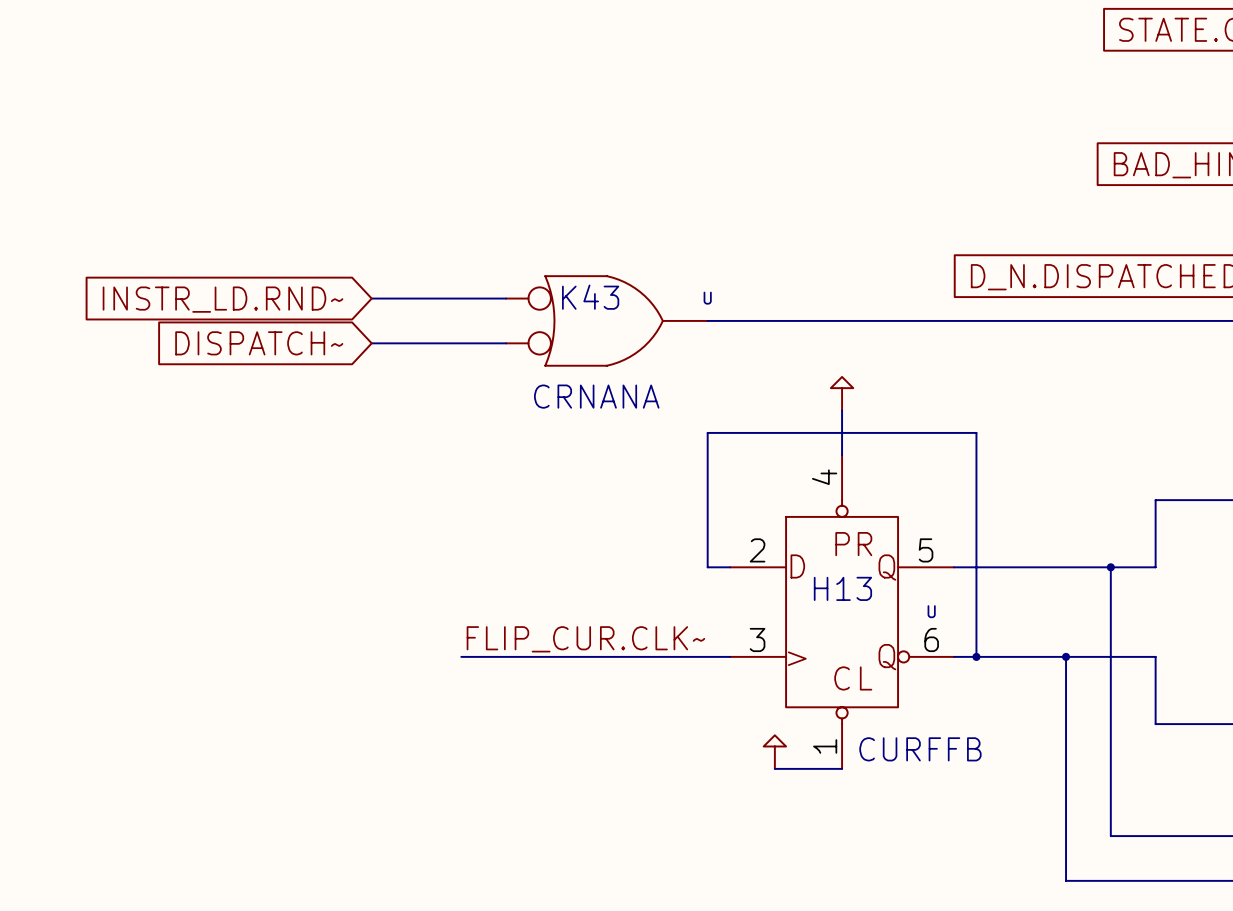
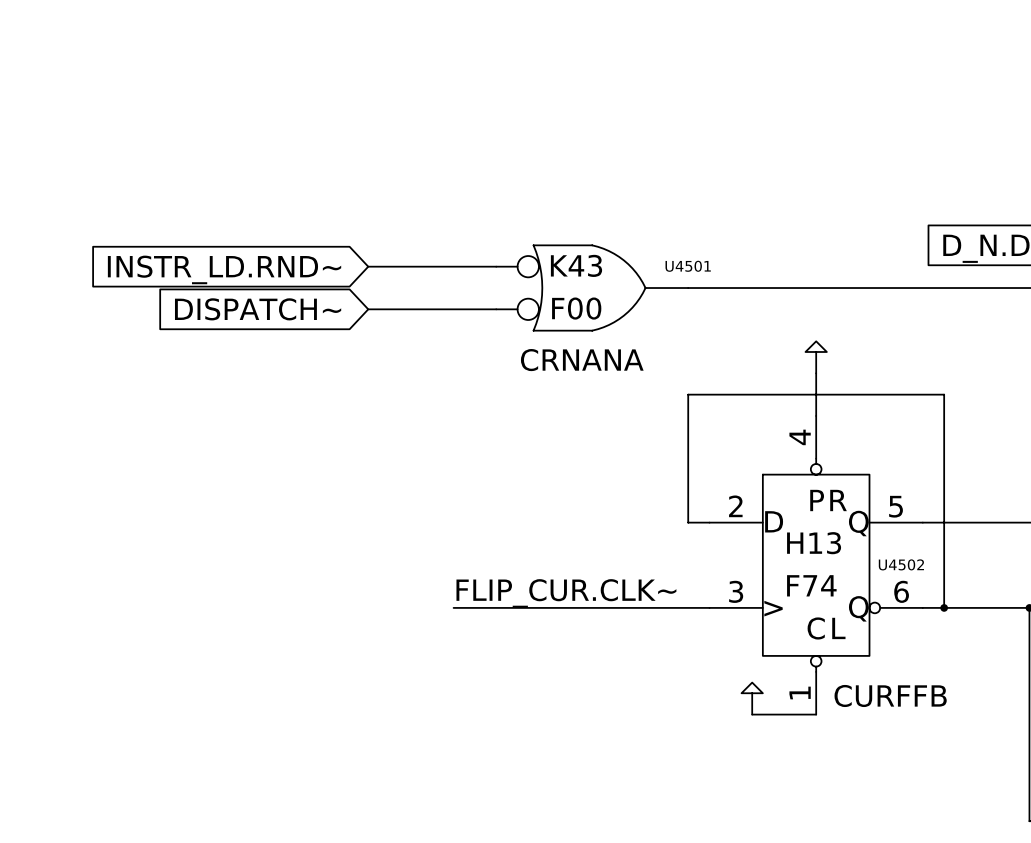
U name: U (707, 298) -> U4501 (688, 266)
U value: none -> F00 (576, 308)
U name: U (931, 611) -> U4502 (901, 564)
U value: none -> F74 (811, 585)

